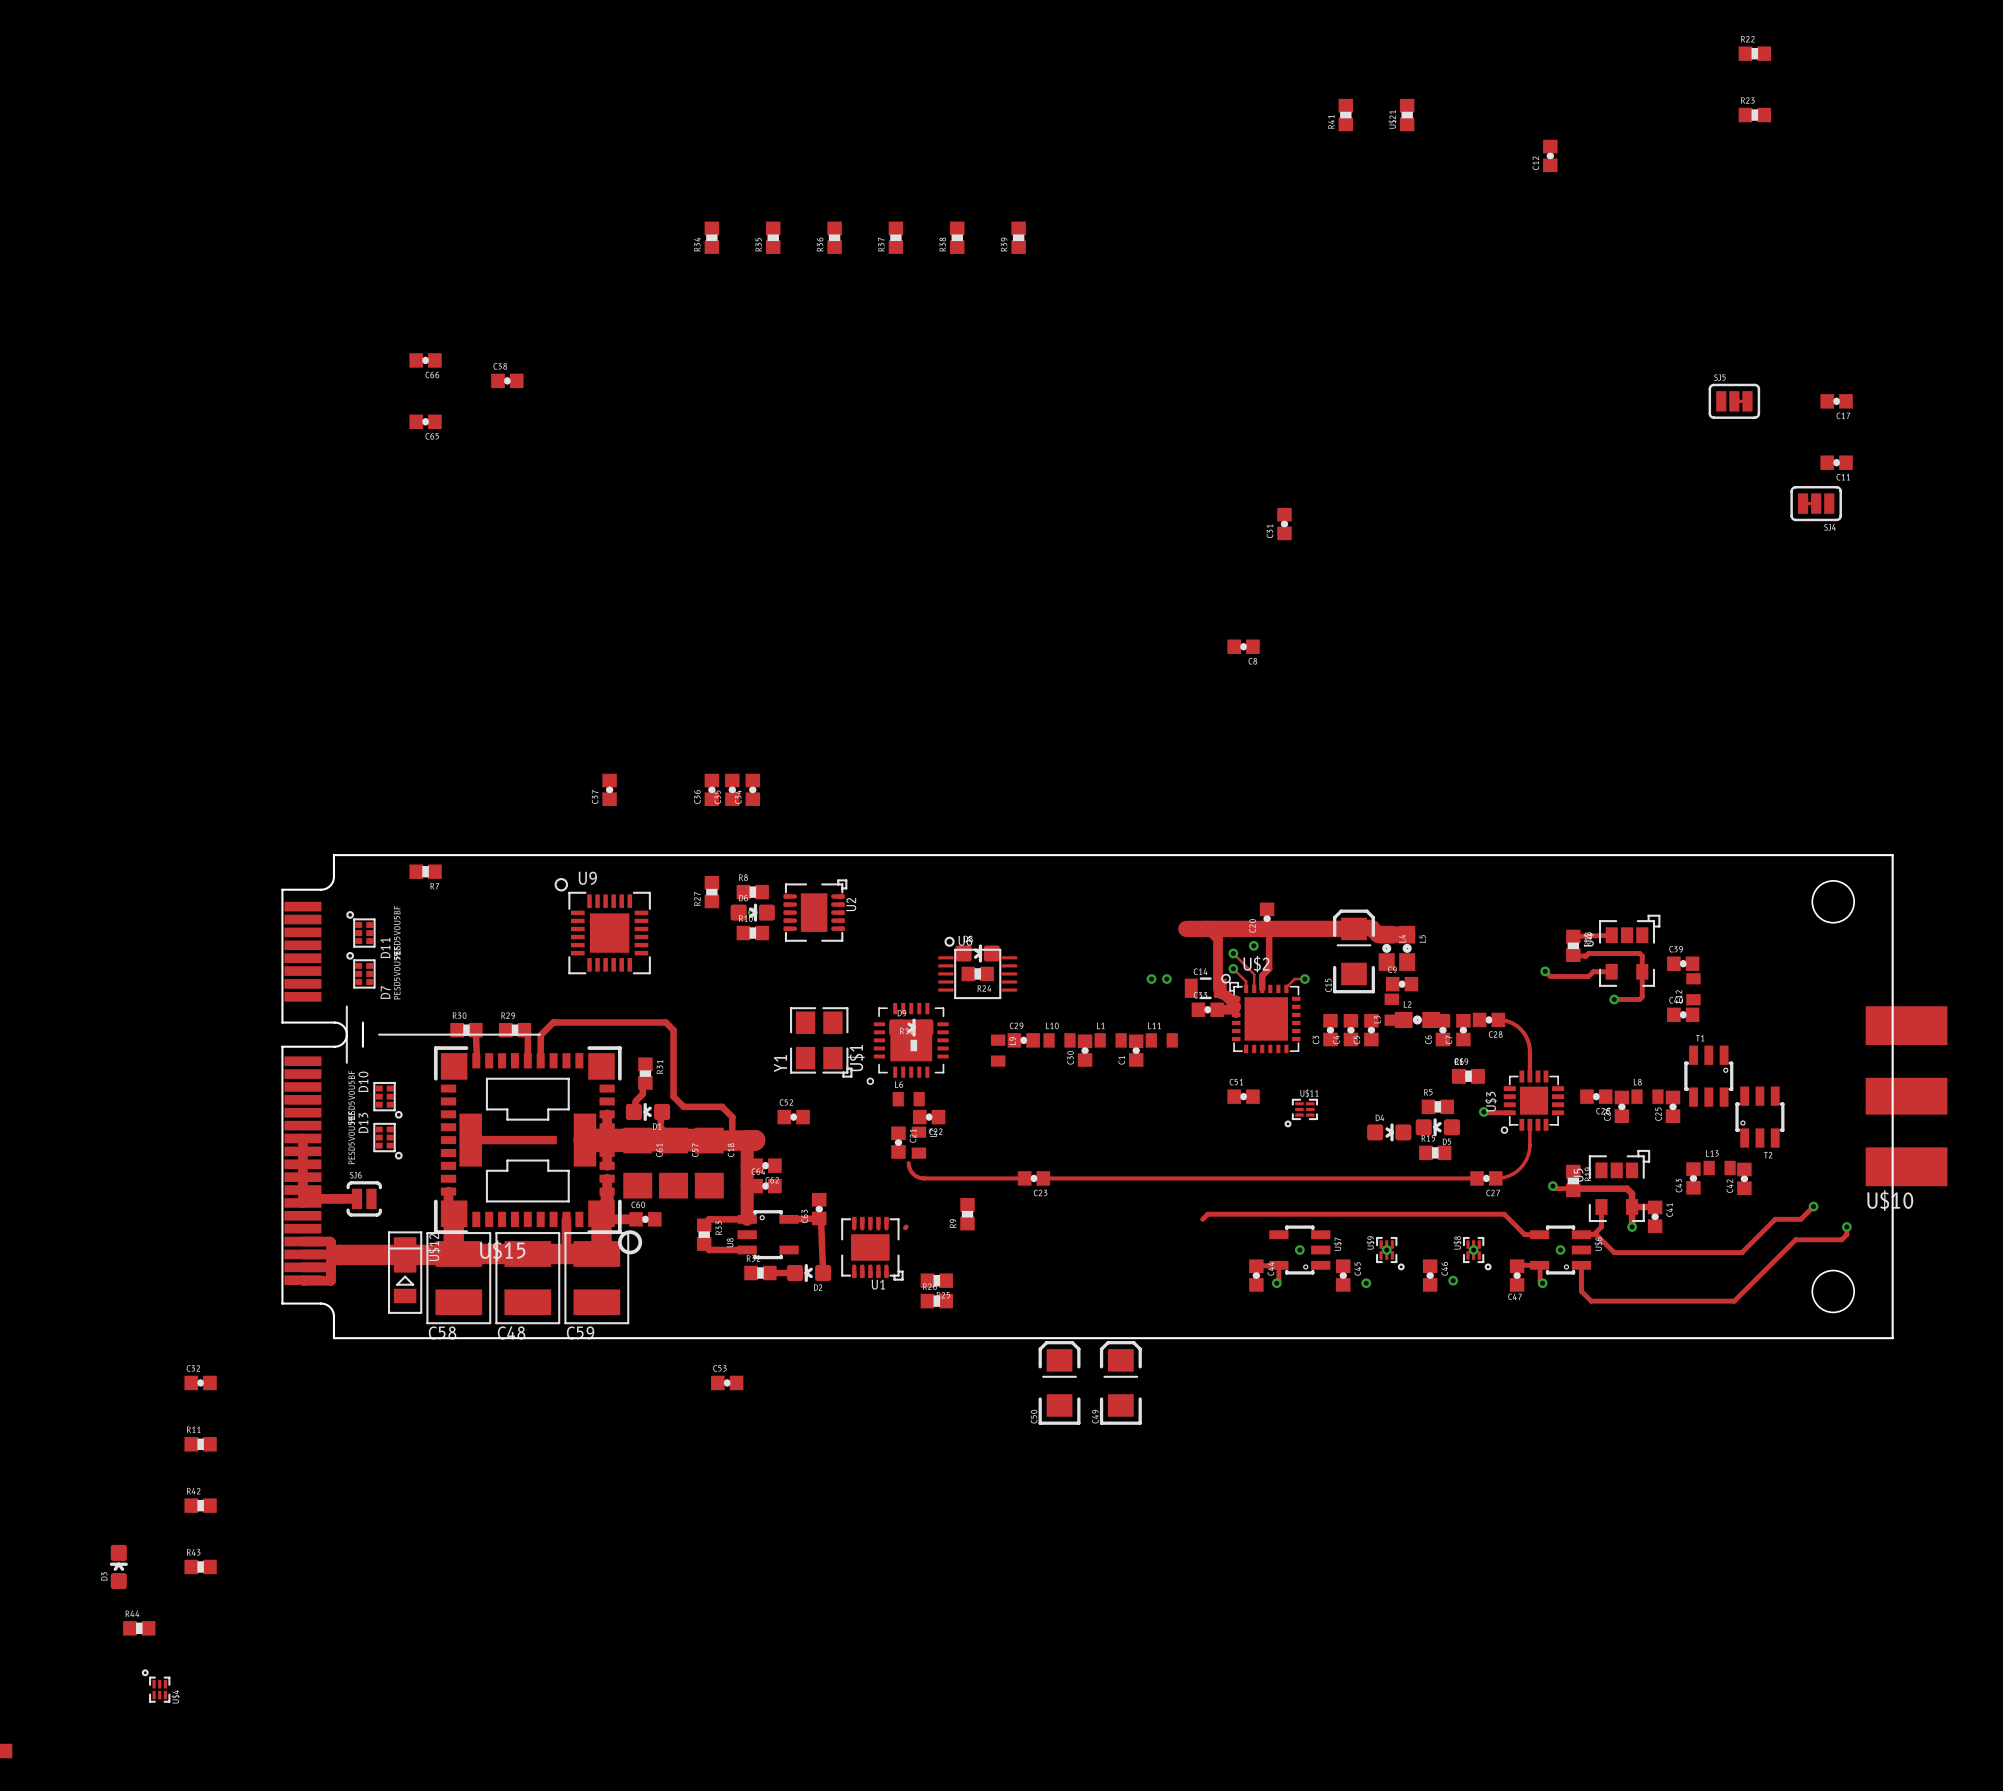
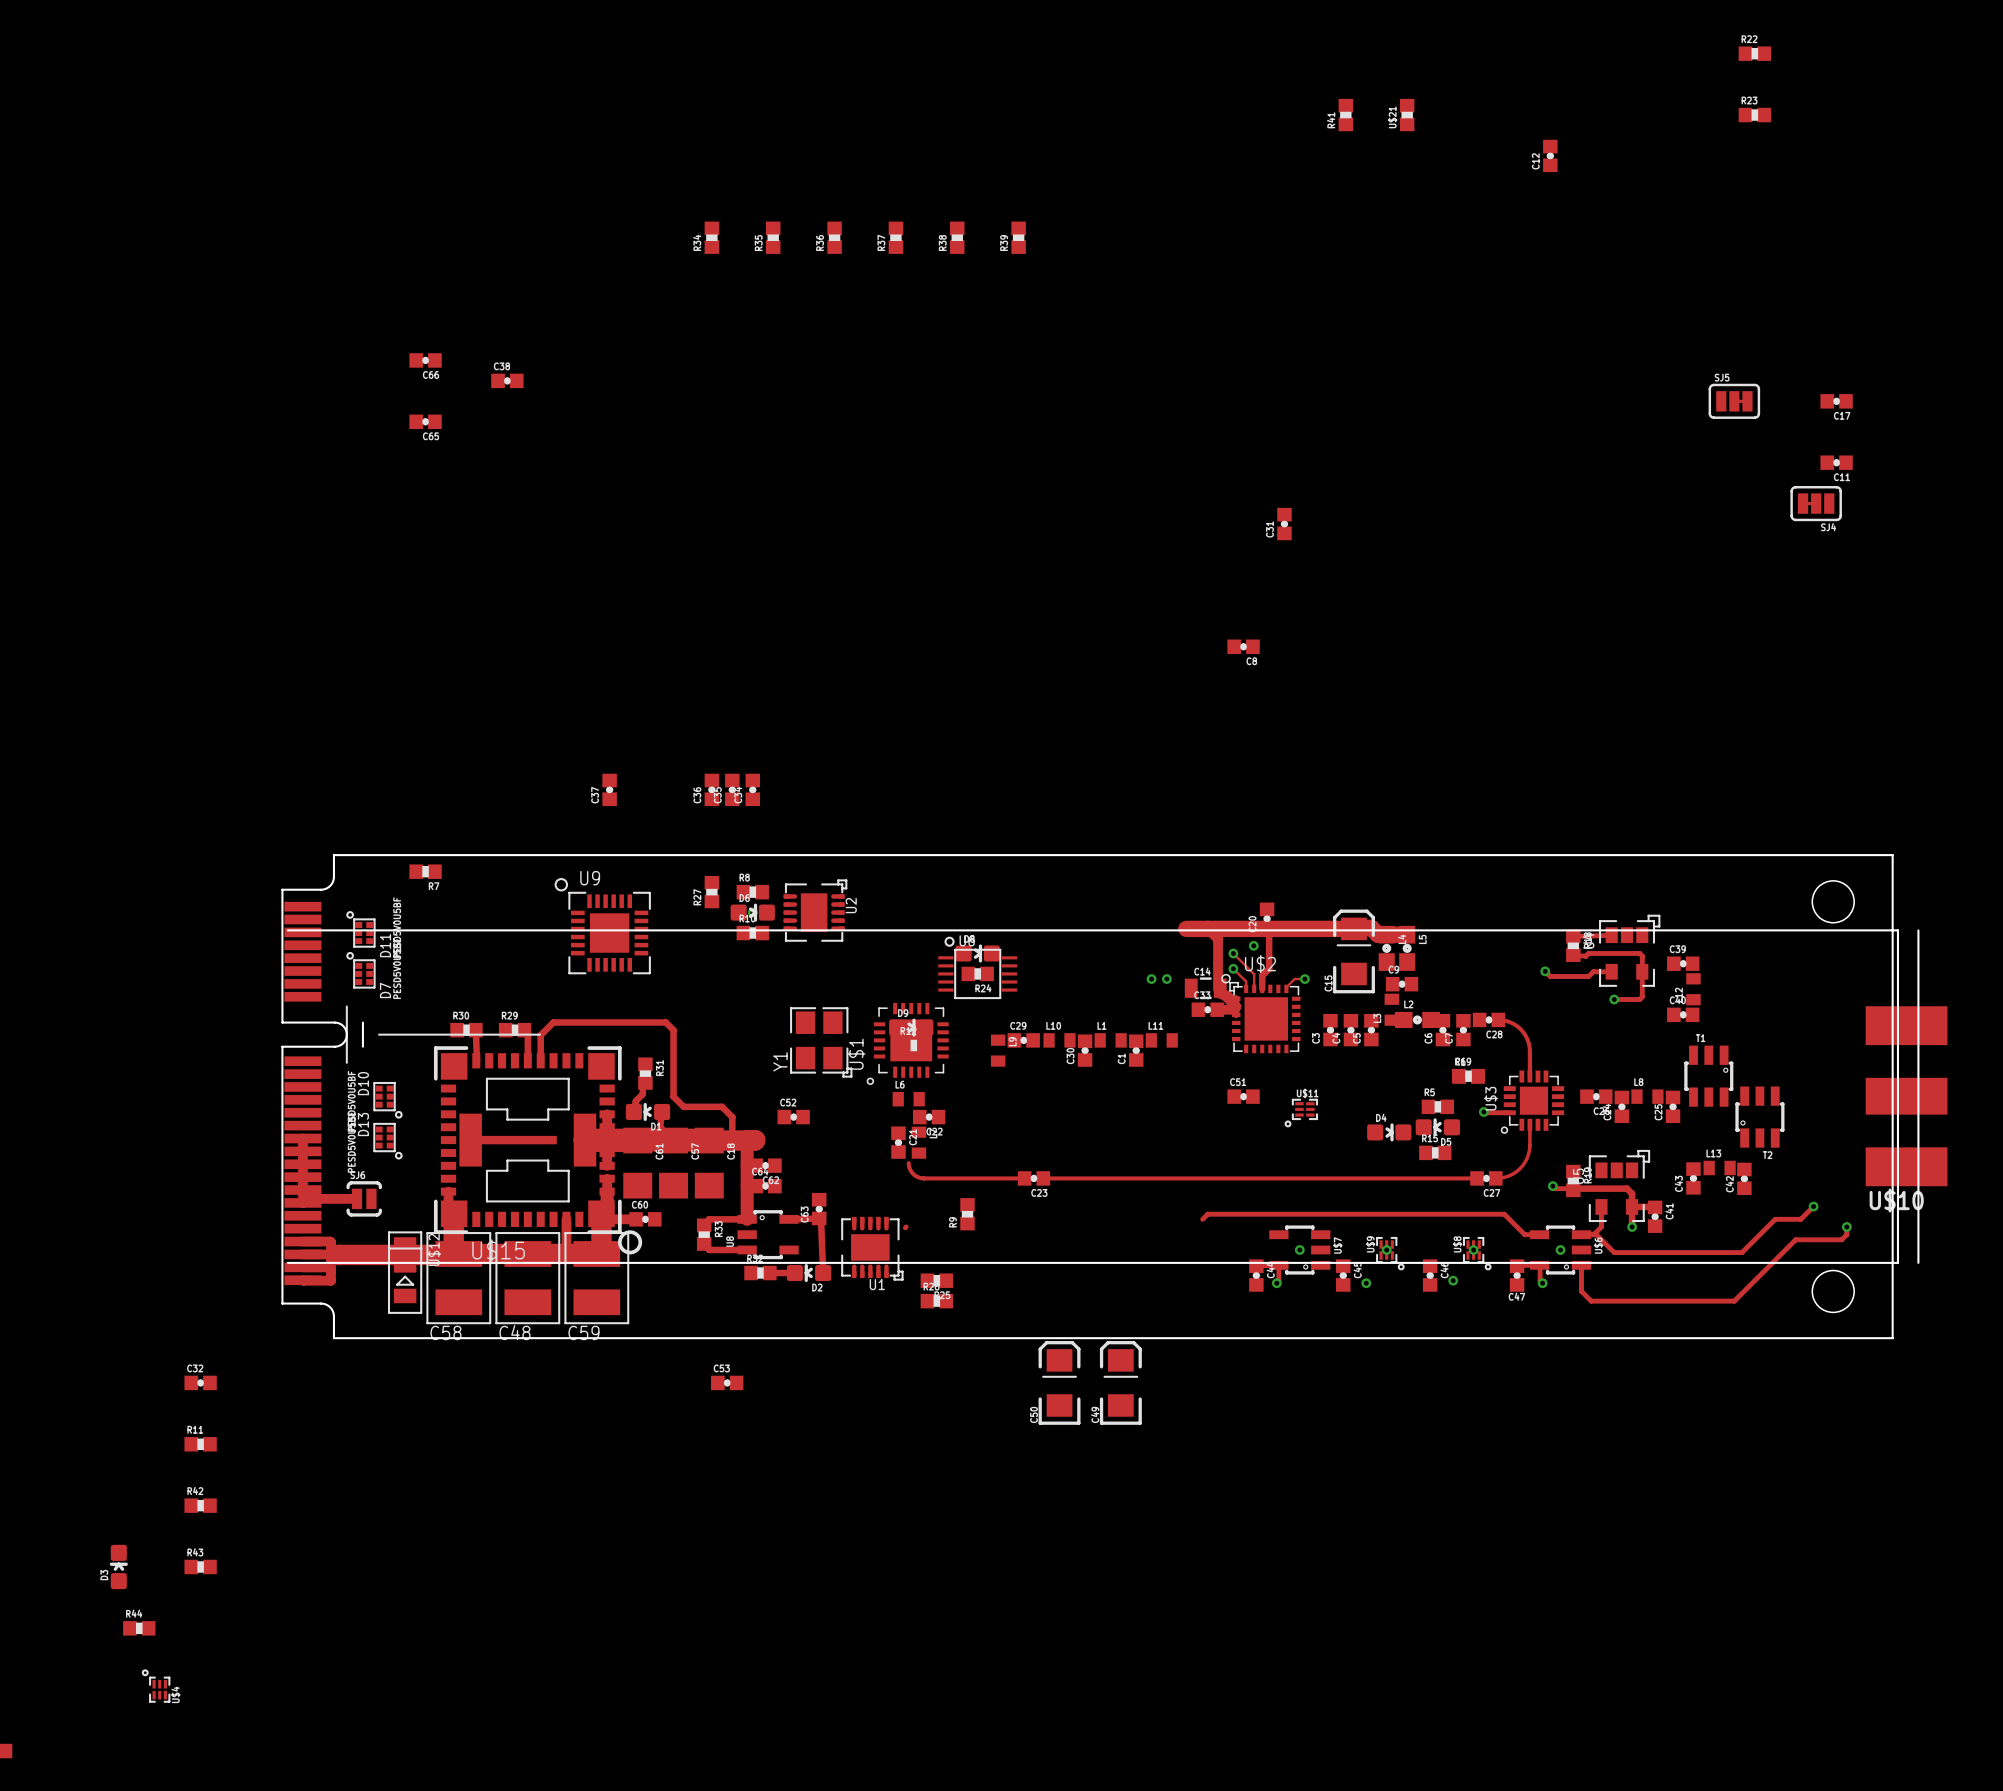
drawing: none -> [286, 929, 1920, 1264]

